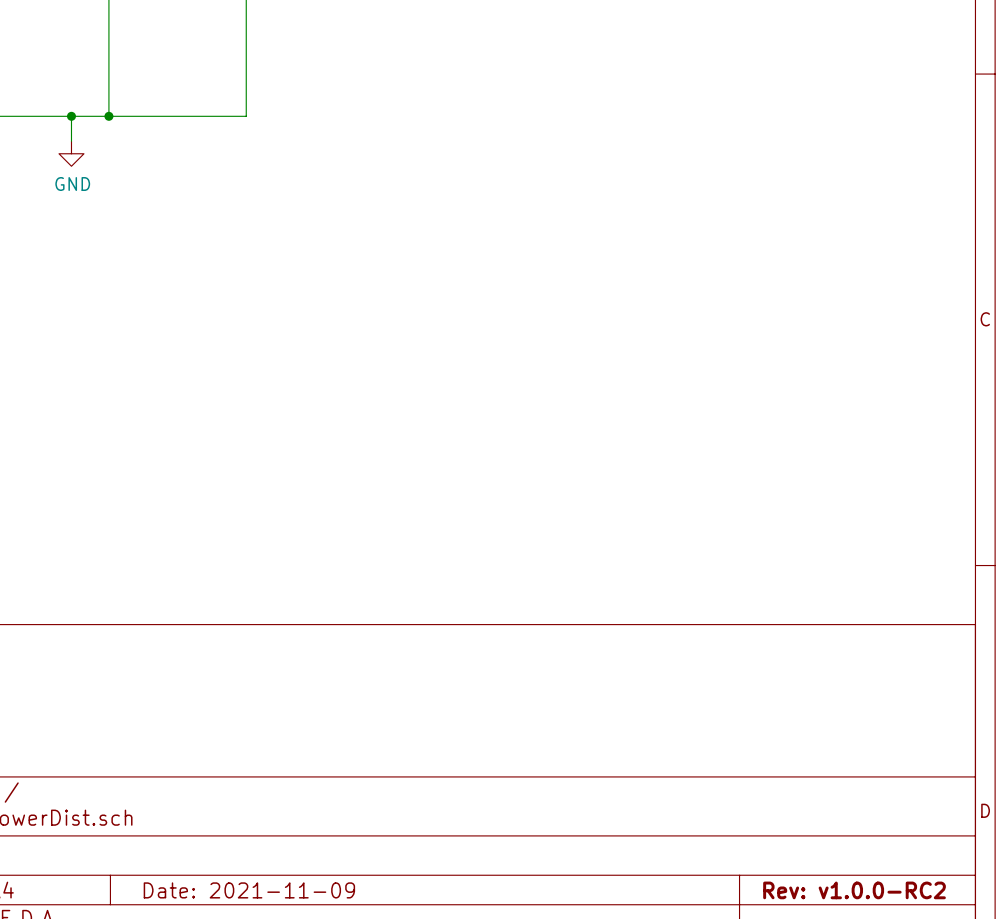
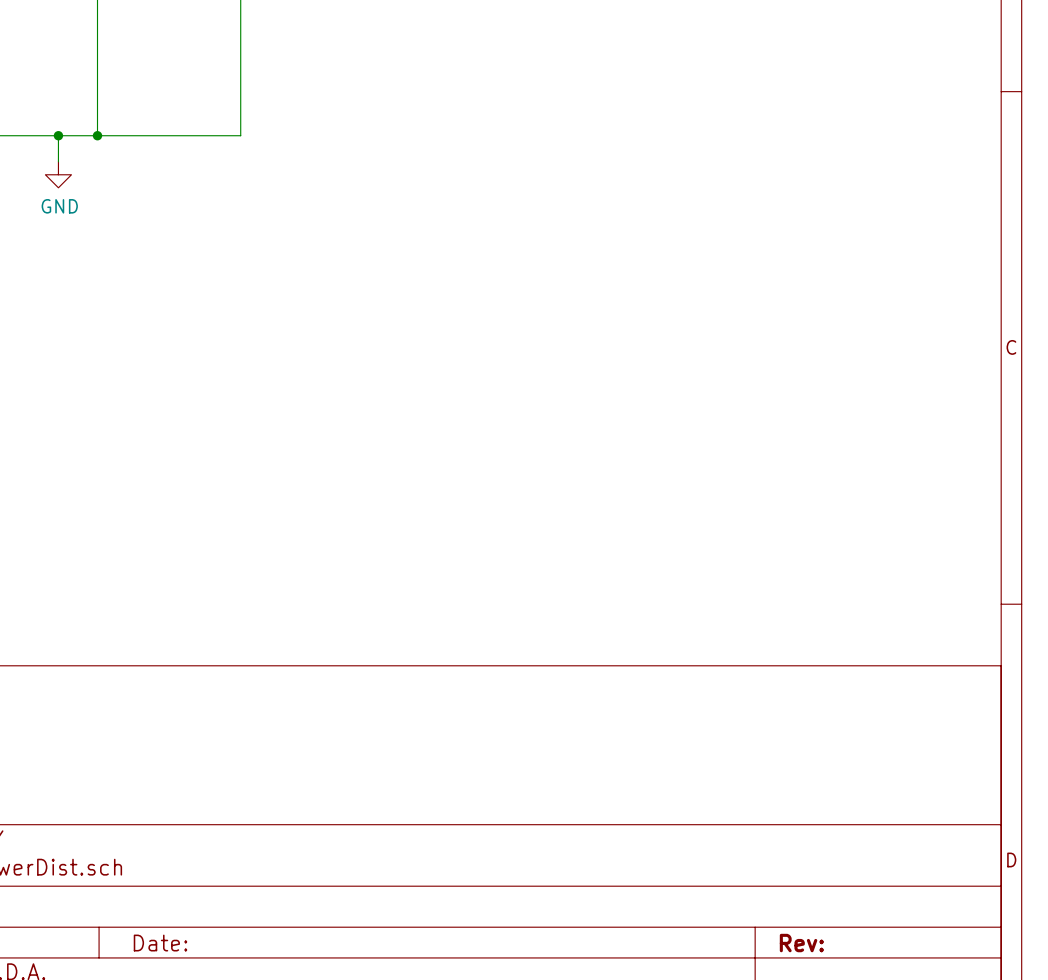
title block: Date: 2021-11-09 (249, 890) -> Date: (160, 943)
title block: Rev: v1.0.0-RC2 (854, 890) -> Rev: (801, 943)

